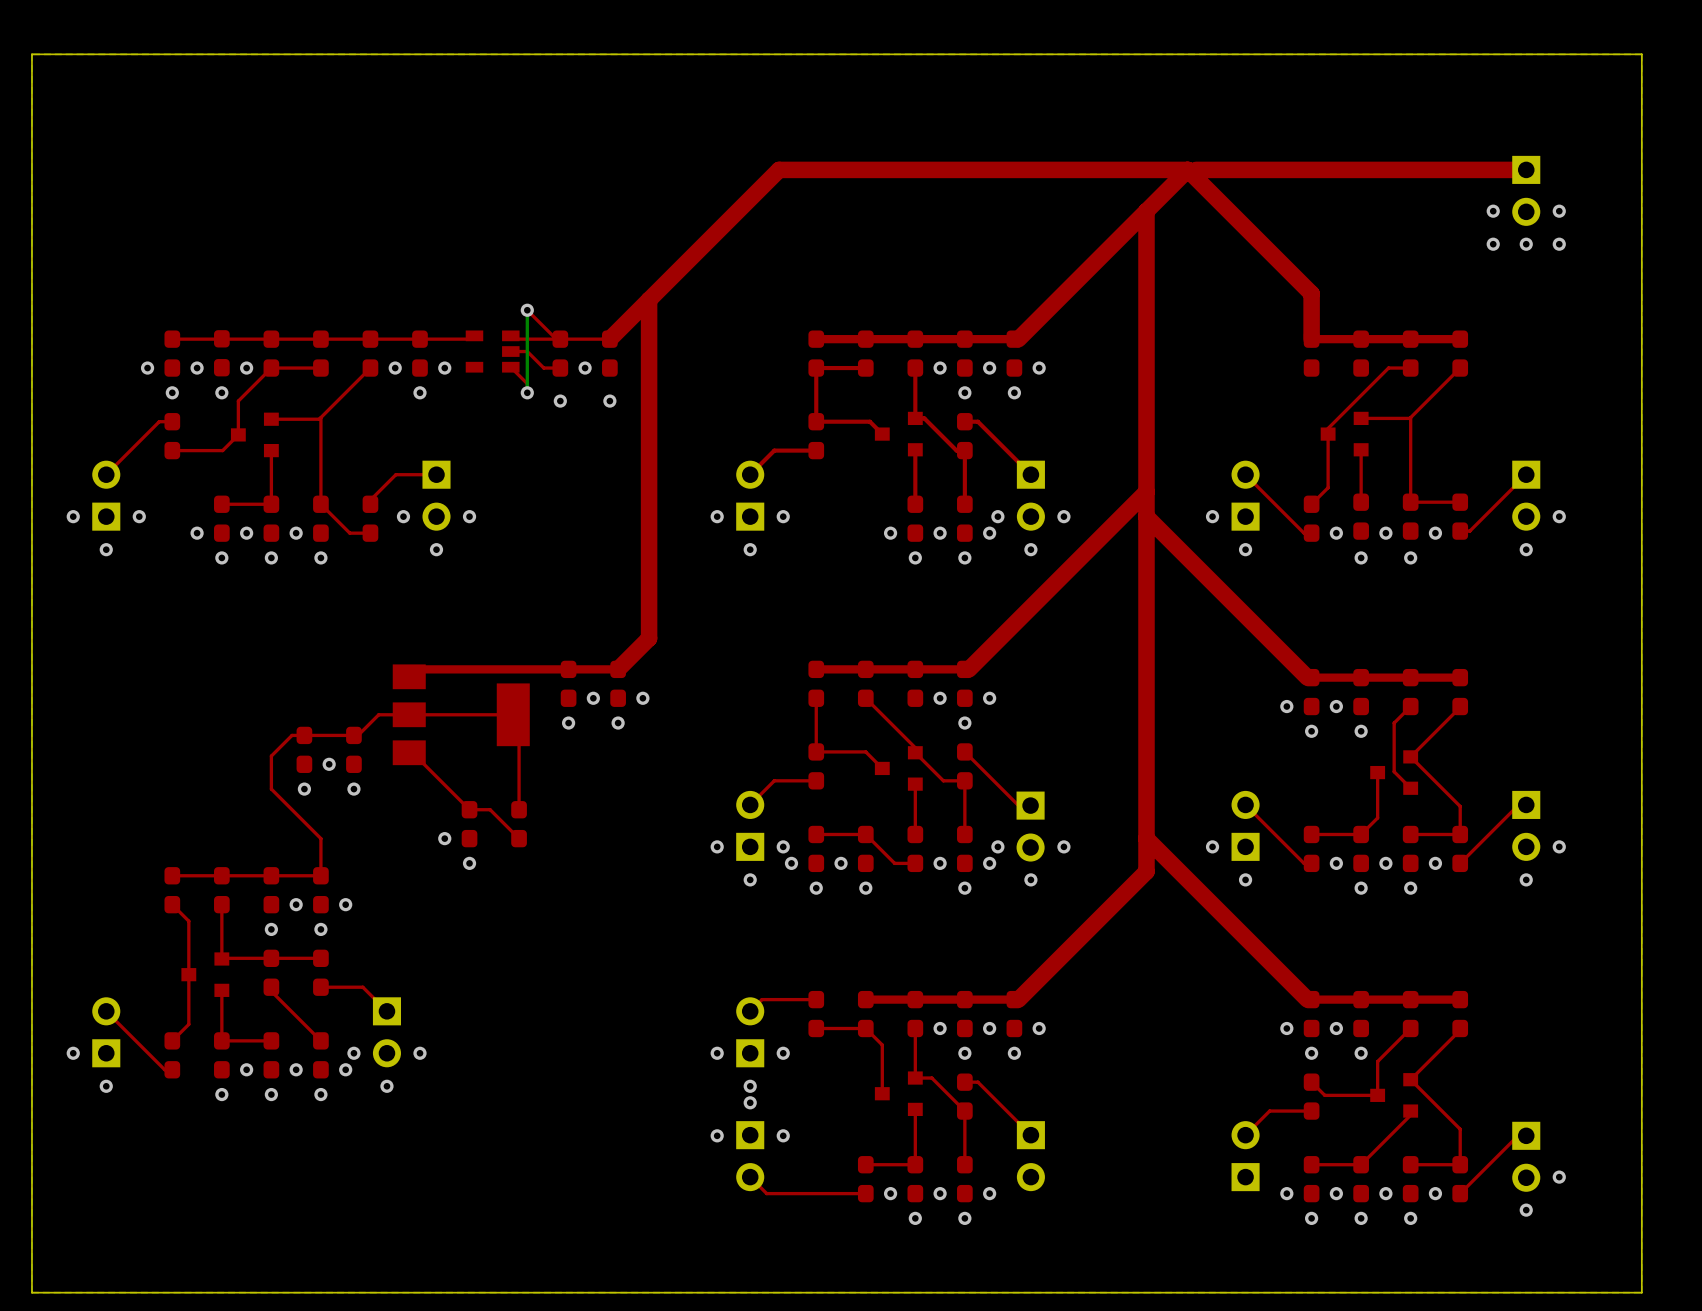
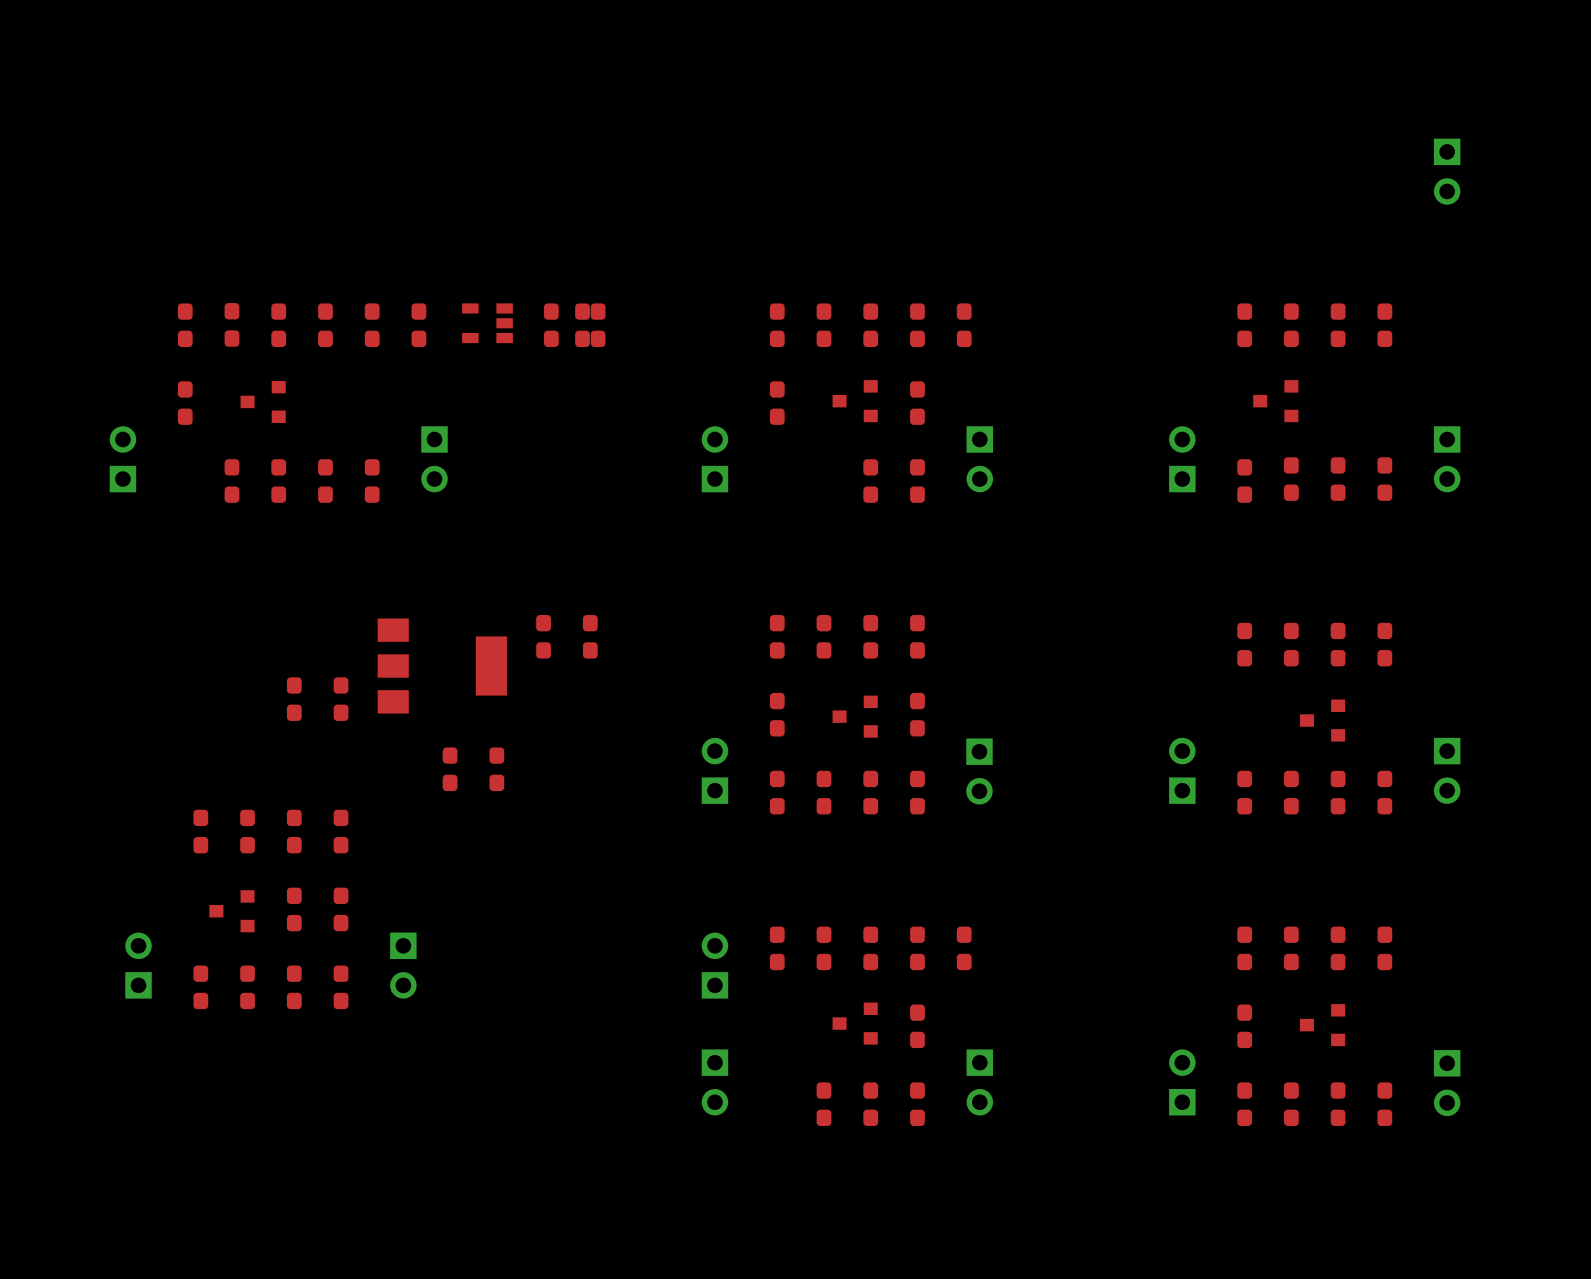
board edge: (1641, 54) (31, 54) (31, 1292) (1641, 1292) (1641, 54) -> none
top track: (1187, 169) (779, 169) (609, 339) (514, 339) (510, 335) -> none
top track: (1187, 169) (1018, 339) (816, 339) -> none
top track: (1187, 169) (1311, 293) (1311, 339) (1460, 339) -> none
top track: (1526, 169) (1187, 169) -> none
top track: (1146, 211) (1146, 871) (1018, 999) (865, 999) -> none
via: (1493, 211) -> none
via: (1559, 211) -> none
via: (1493, 244) -> none
via: (1526, 244) -> none
via: (1559, 244) -> none
top track: (649, 299) (649, 638) (618, 669) (416, 669) (409, 676) -> none
top track: (527, 310) (556, 339) -> none
bottom track: (527, 310) (527, 392) -> none
via: (527, 310) -> none
top track: (474, 335) (471, 339) (172, 339) -> none
part position: (492, 351) -> (487, 323)
top track: (510, 351) (527, 351) (543, 368) (560, 368) -> none
part position: (172, 353) -> (185, 325)
part position: (221, 353) -> (231, 324)
part: (271, 353) -> none
part: none -> (278, 325)
part: (320, 353) -> none
part: none -> (325, 325)
part: (370, 353) -> none
part: none -> (372, 325)
part: (419, 353) -> none
part: none -> (418, 325)
part position: (560, 353) -> (551, 325)
part: none -> (598, 325)
top track: (510, 367) (527, 383) (527, 392) -> none
via: (147, 368) -> none
via: (197, 368) -> none
via: (246, 368) -> none
top track: (320, 368) (271, 368) (238, 401) (238, 434) (222, 450) (172, 450) -> none
top track: (370, 368) (319, 419) (271, 419) -> none
via: (395, 368) -> none
via: (444, 368) -> none
via: (585, 368) -> none
top track: (865, 368) (816, 368) (816, 421) (869, 421) (882, 434) -> none
top track: (915, 368) (915, 418) (924, 418) (956, 450) (964, 450) (964, 504) -> none
via: (940, 368) -> none
via: (989, 368) -> none
via: (1039, 368) -> none
top track: (1410, 368) (1388, 368) (1328, 428) (1328, 487) (1311, 504) -> none
top track: (1460, 368) (1409, 418) (1361, 418) -> none
via: (172, 392) -> none
via: (221, 392) -> none
via: (419, 392) -> none
via: (527, 392) -> none
via: (964, 392) -> none
via: (1014, 392) -> none
via: (560, 401) -> none
via: (609, 401) -> none
top track: (320, 417) (320, 504) (349, 533) (370, 533) -> none
top track: (1410, 417) (1410, 502) (1460, 502) -> none
top track: (172, 421) (159, 421) (106, 474) -> none
top track: (964, 421) (977, 421) (1030, 474) -> none
part position: (254, 434) -> (263, 401)
part position: (172, 436) -> (185, 403)
top track: (915, 449) (915, 504) -> none
top track: (1361, 449) (1361, 502) -> none
top track: (271, 450) (271, 504) (221, 504) -> none
top track: (816, 450) (774, 450) (750, 474) -> none
top track: (436, 474) (395, 474) (370, 500) (370, 504) -> none
top track: (1245, 474) (1304, 533) (1311, 533) -> none
top track: (1526, 474) (1469, 531) (1460, 531) -> none
top track: (1146, 491) (968, 669) (816, 669) -> none
part position: (106, 495) -> (122, 459)
part position: (436, 495) -> (434, 459)
via: (73, 516) -> none
via: (139, 516) -> none
via: (403, 516) -> none
via: (469, 516) -> none
via: (717, 516) -> none
via: (783, 516) -> none
via: (997, 516) -> none
via: (1063, 516) -> none
top track: (1146, 516) (1307, 677) (1460, 677) -> none
via: (1212, 516) -> none
via: (1559, 516) -> none
part: (221, 518) -> none
part: none -> (231, 481)
part: (271, 518) -> none
part: none -> (278, 481)
part: (320, 518) -> none
part: none -> (325, 481)
part: (370, 518) -> none
part: none -> (372, 481)
via: (197, 533) -> none
via: (246, 533) -> none
via: (296, 533) -> none
via: (890, 533) -> none
via: (940, 533) -> none
via: (989, 533) -> none
via: (1336, 533) -> none
via: (1385, 533) -> none
via: (1435, 533) -> none
via: (106, 549) -> none
via: (436, 549) -> none
via: (750, 549) -> none
via: (1030, 549) -> none
via: (1245, 549) -> none
via: (1526, 549) -> none
via: (221, 557) -> none
via: (271, 557) -> none
via: (320, 557) -> none
via: (915, 557) -> none
via: (964, 557) -> none
via: (1361, 557) -> none
via: (1410, 557) -> none
via: (593, 698) -> none
via: (642, 698) -> none
top track: (816, 698) (816, 751) (865, 751) (882, 768) -> none
top track: (865, 698) (915, 747) (915, 752) (943, 780) (964, 780) (964, 834) -> none
via: (940, 698) -> none
via: (989, 698) -> none
via: (1286, 706) -> none
via: (1336, 706) -> none
top track: (1410, 706) (1394, 723) (1394, 771) (1410, 788) -> none
top track: (1460, 706) (1410, 756) (1460, 806) (1460, 834) (1410, 834) -> none
via: (568, 723) -> none
via: (618, 723) -> none
via: (964, 723) -> none
via: (1311, 731) -> none
via: (1361, 731) -> none
top track: (964, 751) (1018, 805) (1030, 805) -> none
top track: (409, 752) (412, 752) (469, 809) (490, 809) (519, 838) -> none
via: (329, 764) -> none
top track: (1377, 772) (1377, 817) (1361, 834) (1311, 834) -> none
top track: (816, 780) (774, 780) (750, 804) -> none
top track: (915, 784) (915, 834) -> none
via: (304, 789) -> none
via: (353, 789) -> none
top track: (1245, 804) (1304, 863) (1311, 863) -> none
top track: (1526, 804) (1518, 804) (1460, 863) -> none
top track: (519, 809) (519, 720) (513, 714) (378, 714) (358, 735) (292, 735) (271, 756) (271, 789) (320, 838) (320, 875) (172, 875) -> none
top track: (816, 834) (865, 834) (894, 863) (915, 863) -> none
via: (444, 838) -> none
top track: (1146, 838) (1307, 999) (1460, 999) -> none
via: (717, 846) -> none
via: (783, 846) -> none
via: (997, 846) -> none
via: (1063, 846) -> none
via: (1212, 846) -> none
via: (1559, 846) -> none
via: (469, 863) -> none
via: (791, 863) -> none
via: (841, 863) -> none
via: (940, 863) -> none
via: (989, 863) -> none
via: (1336, 863) -> none
via: (1385, 863) -> none
via: (1435, 863) -> none
via: (750, 879) -> none
via: (1030, 879) -> none
via: (1245, 879) -> none
via: (1526, 879) -> none
via: (816, 888) -> none
via: (865, 888) -> none
via: (964, 888) -> none
via: (1361, 888) -> none
via: (1410, 888) -> none
part: (172, 890) -> none
part: none -> (200, 831)
part: (221, 890) -> none
part: none -> (247, 831)
part: (271, 890) -> none
part: none -> (294, 831)
part: (320, 890) -> none
part: none -> (341, 831)
top track: (172, 904) (188, 921) (188, 1024) (172, 1040) -> none
top track: (221, 904) (221, 958) (320, 958) -> none
via: (296, 904) -> none
via: (345, 904) -> none
via: (271, 929) -> none
via: (320, 929) -> none
part: (271, 972) -> none
part: none -> (294, 909)
part: (320, 972) -> none
part: none -> (341, 909)
part position: (205, 974) -> (231, 911)
top track: (271, 987) (271, 991) (320, 1040) -> none
top track: (320, 987) (362, 987) (386, 1011) -> none
top track: (221, 990) (221, 1040) (271, 1040) -> none
top track: (816, 999) (761, 999) (750, 1011) -> none
top track: (106, 1011) (164, 1069) (172, 1069) -> none
top track: (816, 1028) (865, 1028) (882, 1045) (882, 1093) -> none
top track: (915, 1028) (915, 1078) (931, 1078) (964, 1111) (964, 1164) -> none
via: (940, 1028) -> none
via: (989, 1028) -> none
via: (1039, 1028) -> none
via: (1286, 1028) -> none
via: (1336, 1028) -> none
top track: (1410, 1028) (1377, 1061) (1377, 1095) (1324, 1095) (1311, 1082) -> none
top track: (1460, 1028) (1410, 1079) (1460, 1129) (1460, 1164) (1410, 1164) -> none
part position: (106, 1032) -> (138, 965)
part position: (386, 1032) -> (403, 965)
via: (73, 1053) -> none
via: (353, 1053) -> none
via: (419, 1053) -> none
via: (717, 1053) -> none
via: (783, 1053) -> none
via: (964, 1053) -> none
via: (1014, 1053) -> none
via: (1311, 1053) -> none
via: (1361, 1053) -> none
part: (172, 1055) -> none
part: none -> (200, 987)
part: (221, 1055) -> none
part: none -> (247, 987)
part: (271, 1055) -> none
part: none -> (294, 987)
part: (320, 1055) -> none
part: none -> (341, 987)
via: (246, 1069) -> none
via: (296, 1069) -> none
via: (345, 1069) -> none
top track: (964, 1082) (977, 1082) (1030, 1135) -> none
via: (106, 1086) -> none
via: (386, 1086) -> none
via: (750, 1086) -> none
via: (221, 1094) -> none
via: (271, 1094) -> none
via: (320, 1094) -> none
via: (750, 1102) -> none
top track: (915, 1109) (915, 1164) (865, 1164) -> none
top track: (1311, 1111) (1269, 1111) (1245, 1135) -> none
top track: (1410, 1111) (1410, 1115) (1361, 1164) (1311, 1164) -> none
via: (717, 1135) -> none
via: (783, 1135) -> none
top track: (1526, 1135) (1518, 1135) (1460, 1193) -> none
top track: (750, 1177) (766, 1193) (865, 1193) -> none
via: (1559, 1177) -> none
via: (890, 1193) -> none
via: (940, 1193) -> none
via: (989, 1193) -> none
via: (1286, 1193) -> none
via: (1336, 1193) -> none
via: (1385, 1193) -> none
via: (1435, 1193) -> none
via: (1526, 1210) -> none
via: (915, 1218) -> none
via: (964, 1218) -> none
via: (1311, 1218) -> none
via: (1361, 1218) -> none
via: (1410, 1218) -> none

